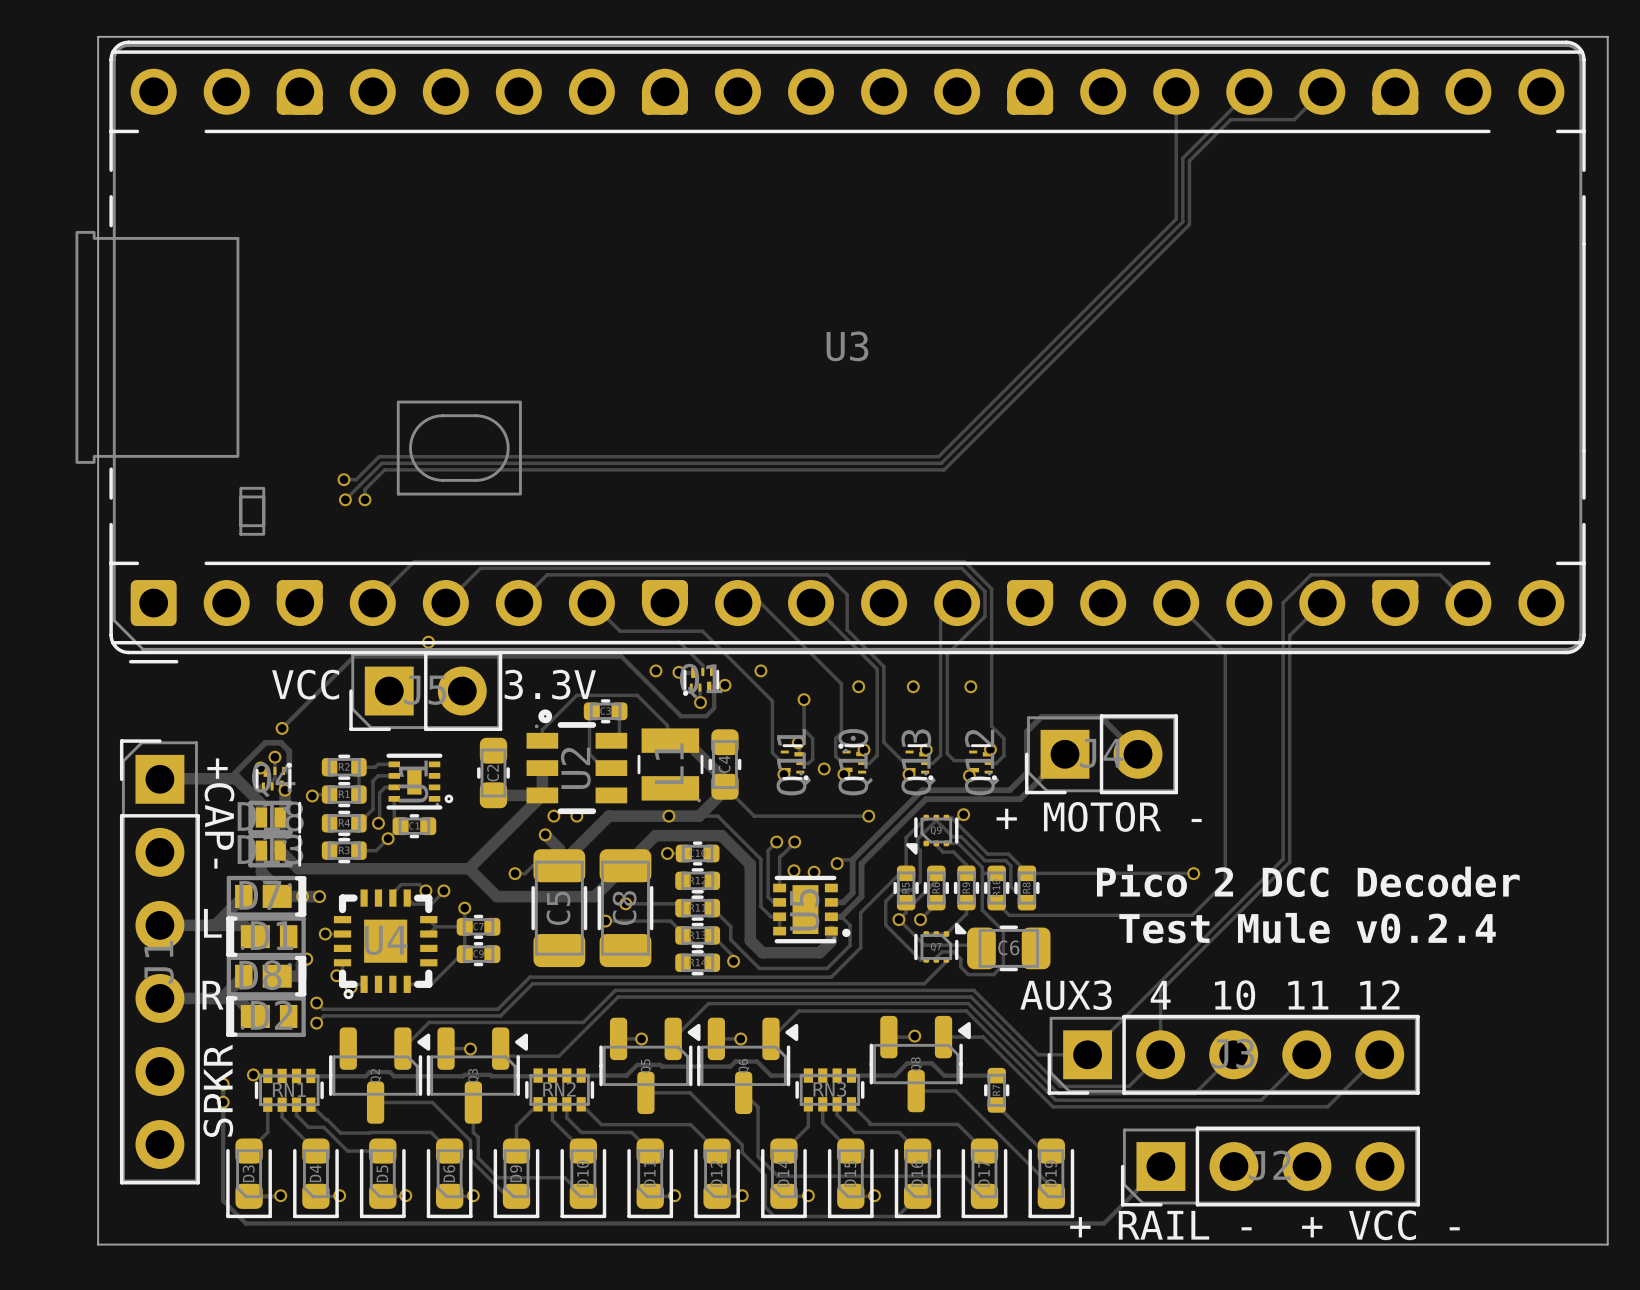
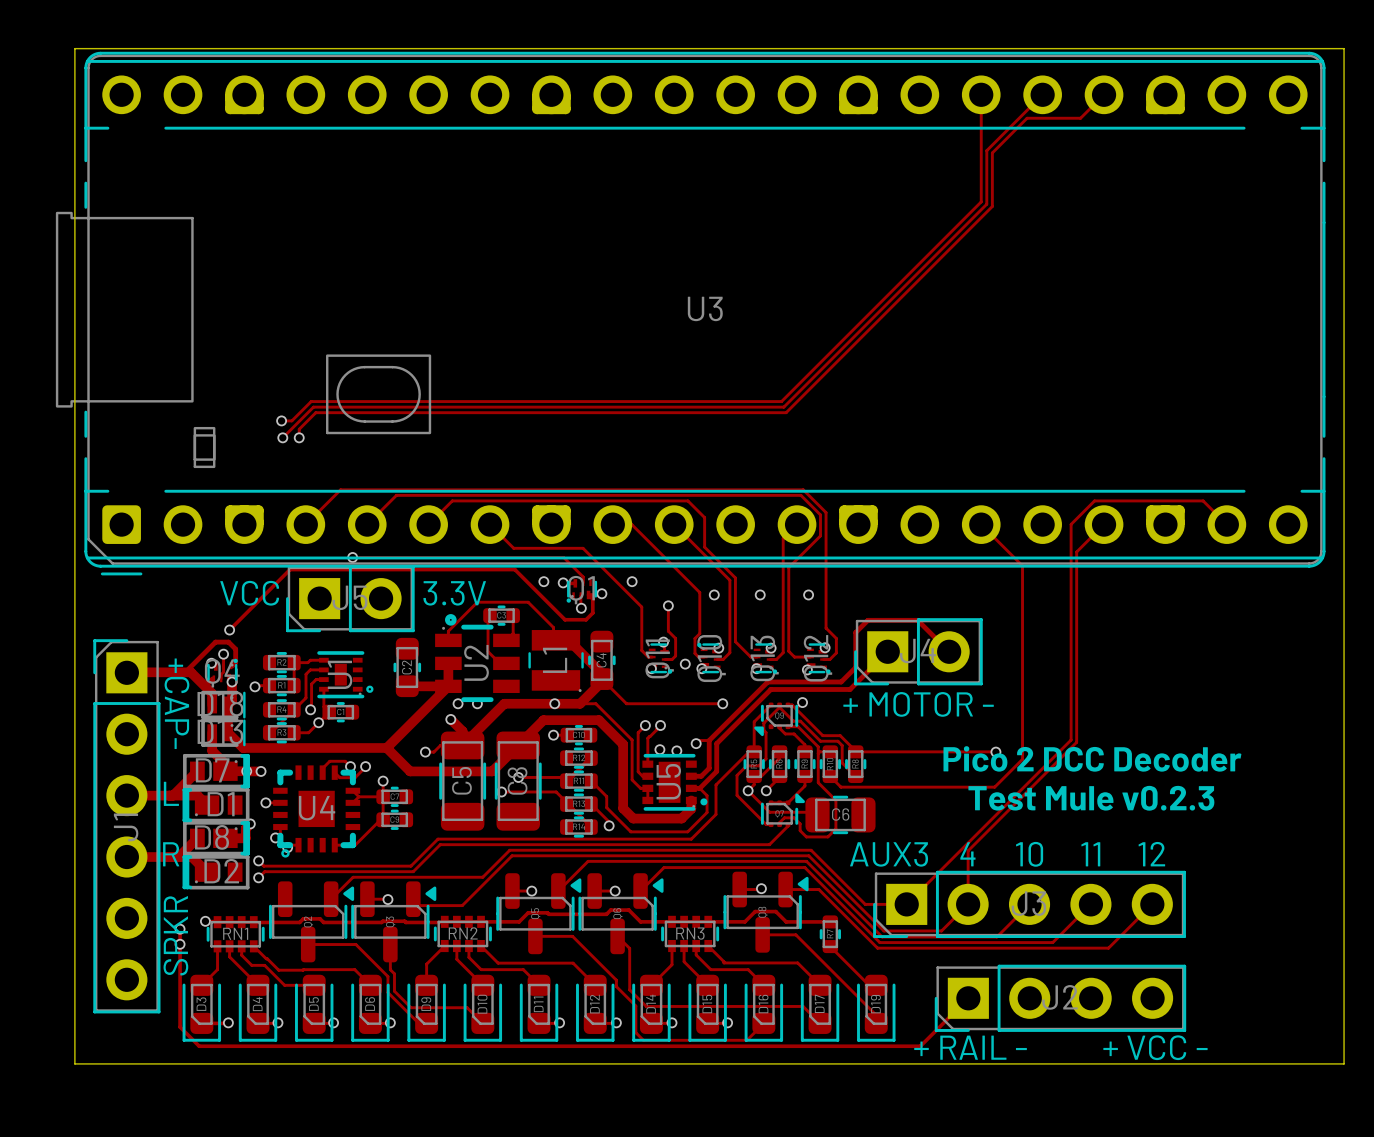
text: Test Mule v0.2.4 (1307, 928) -> Test Mule v0.2.3 (1091, 798)

